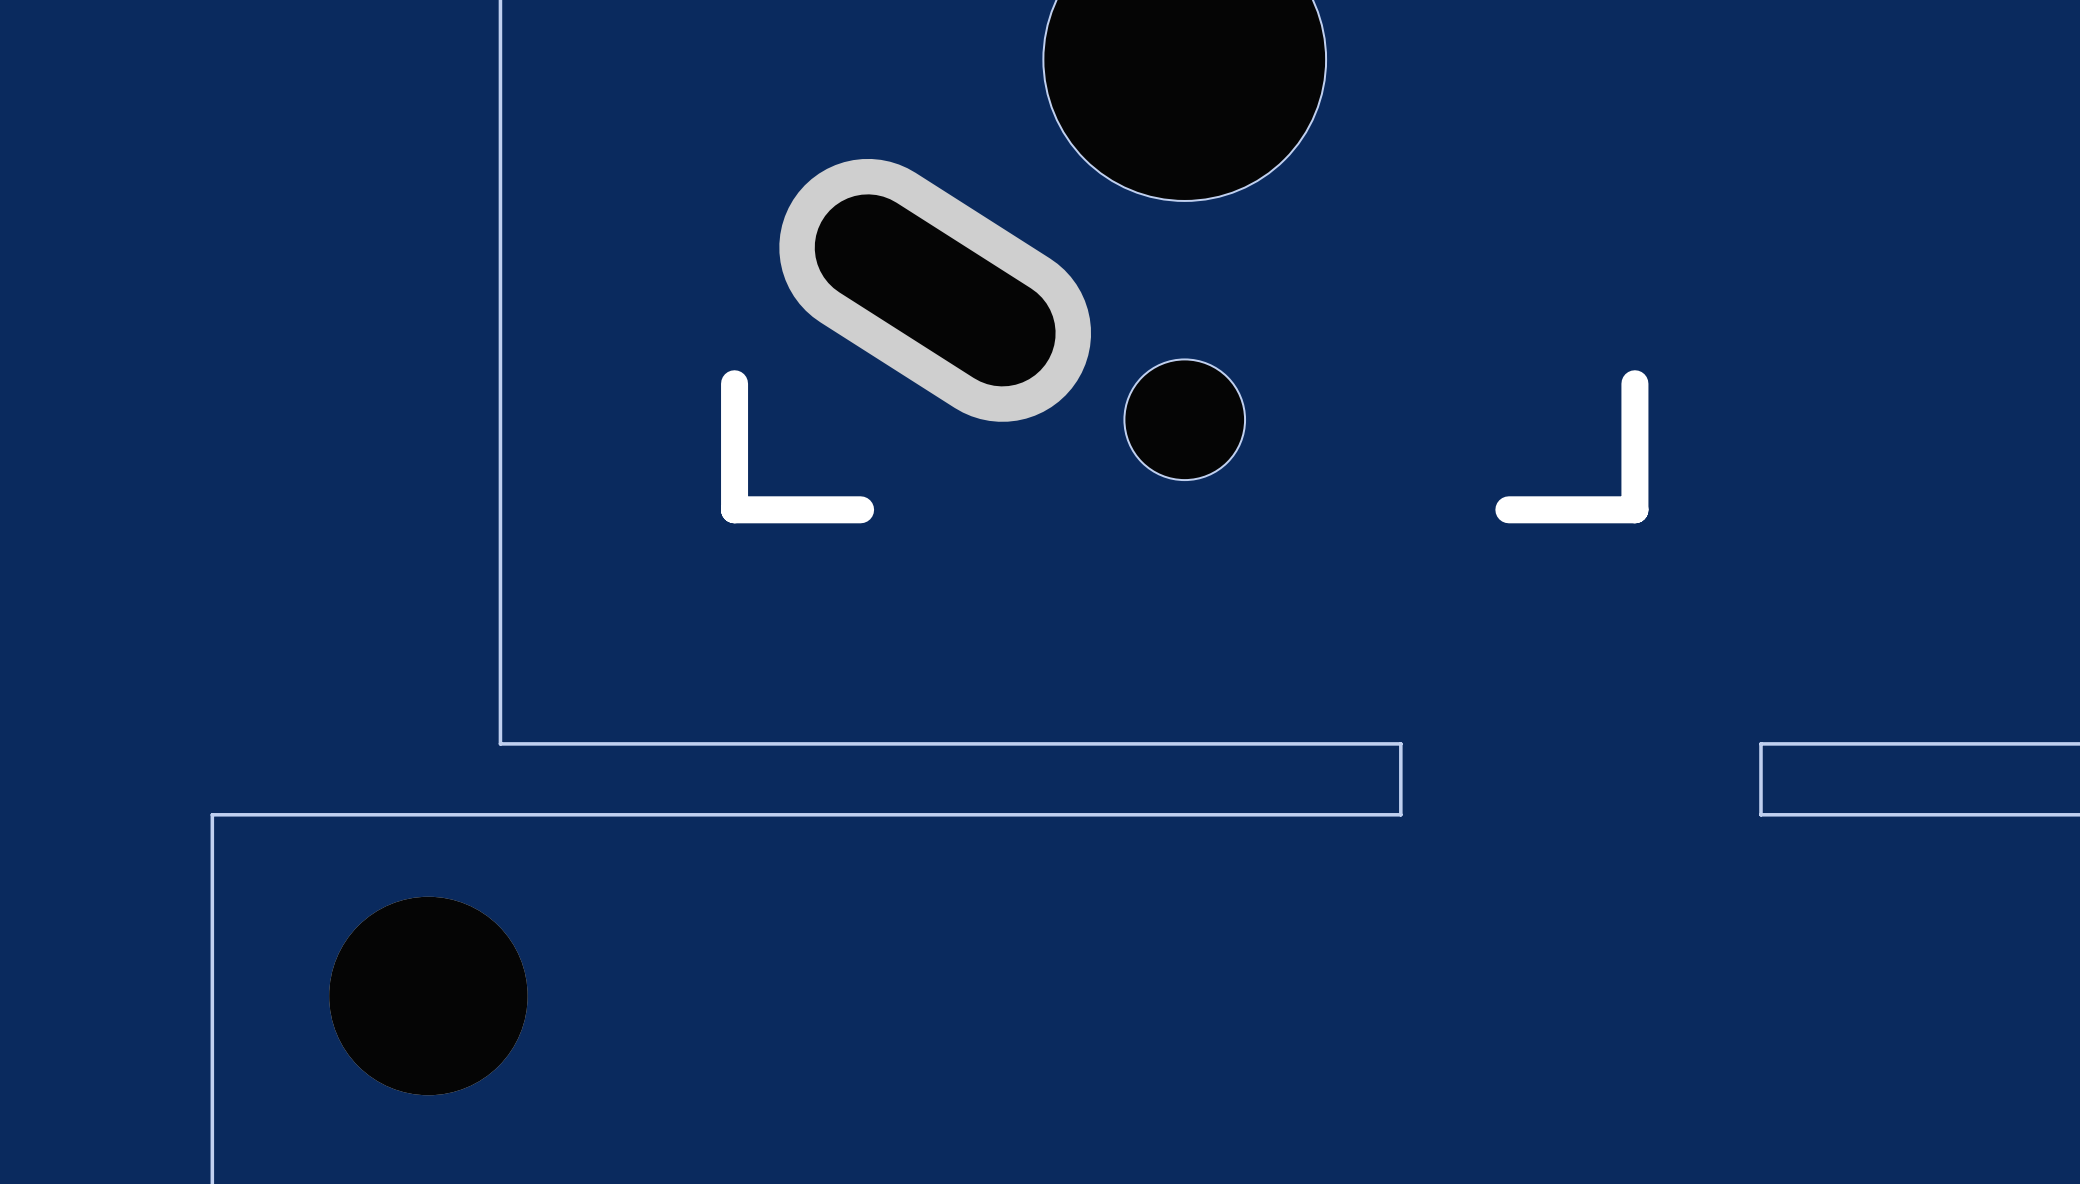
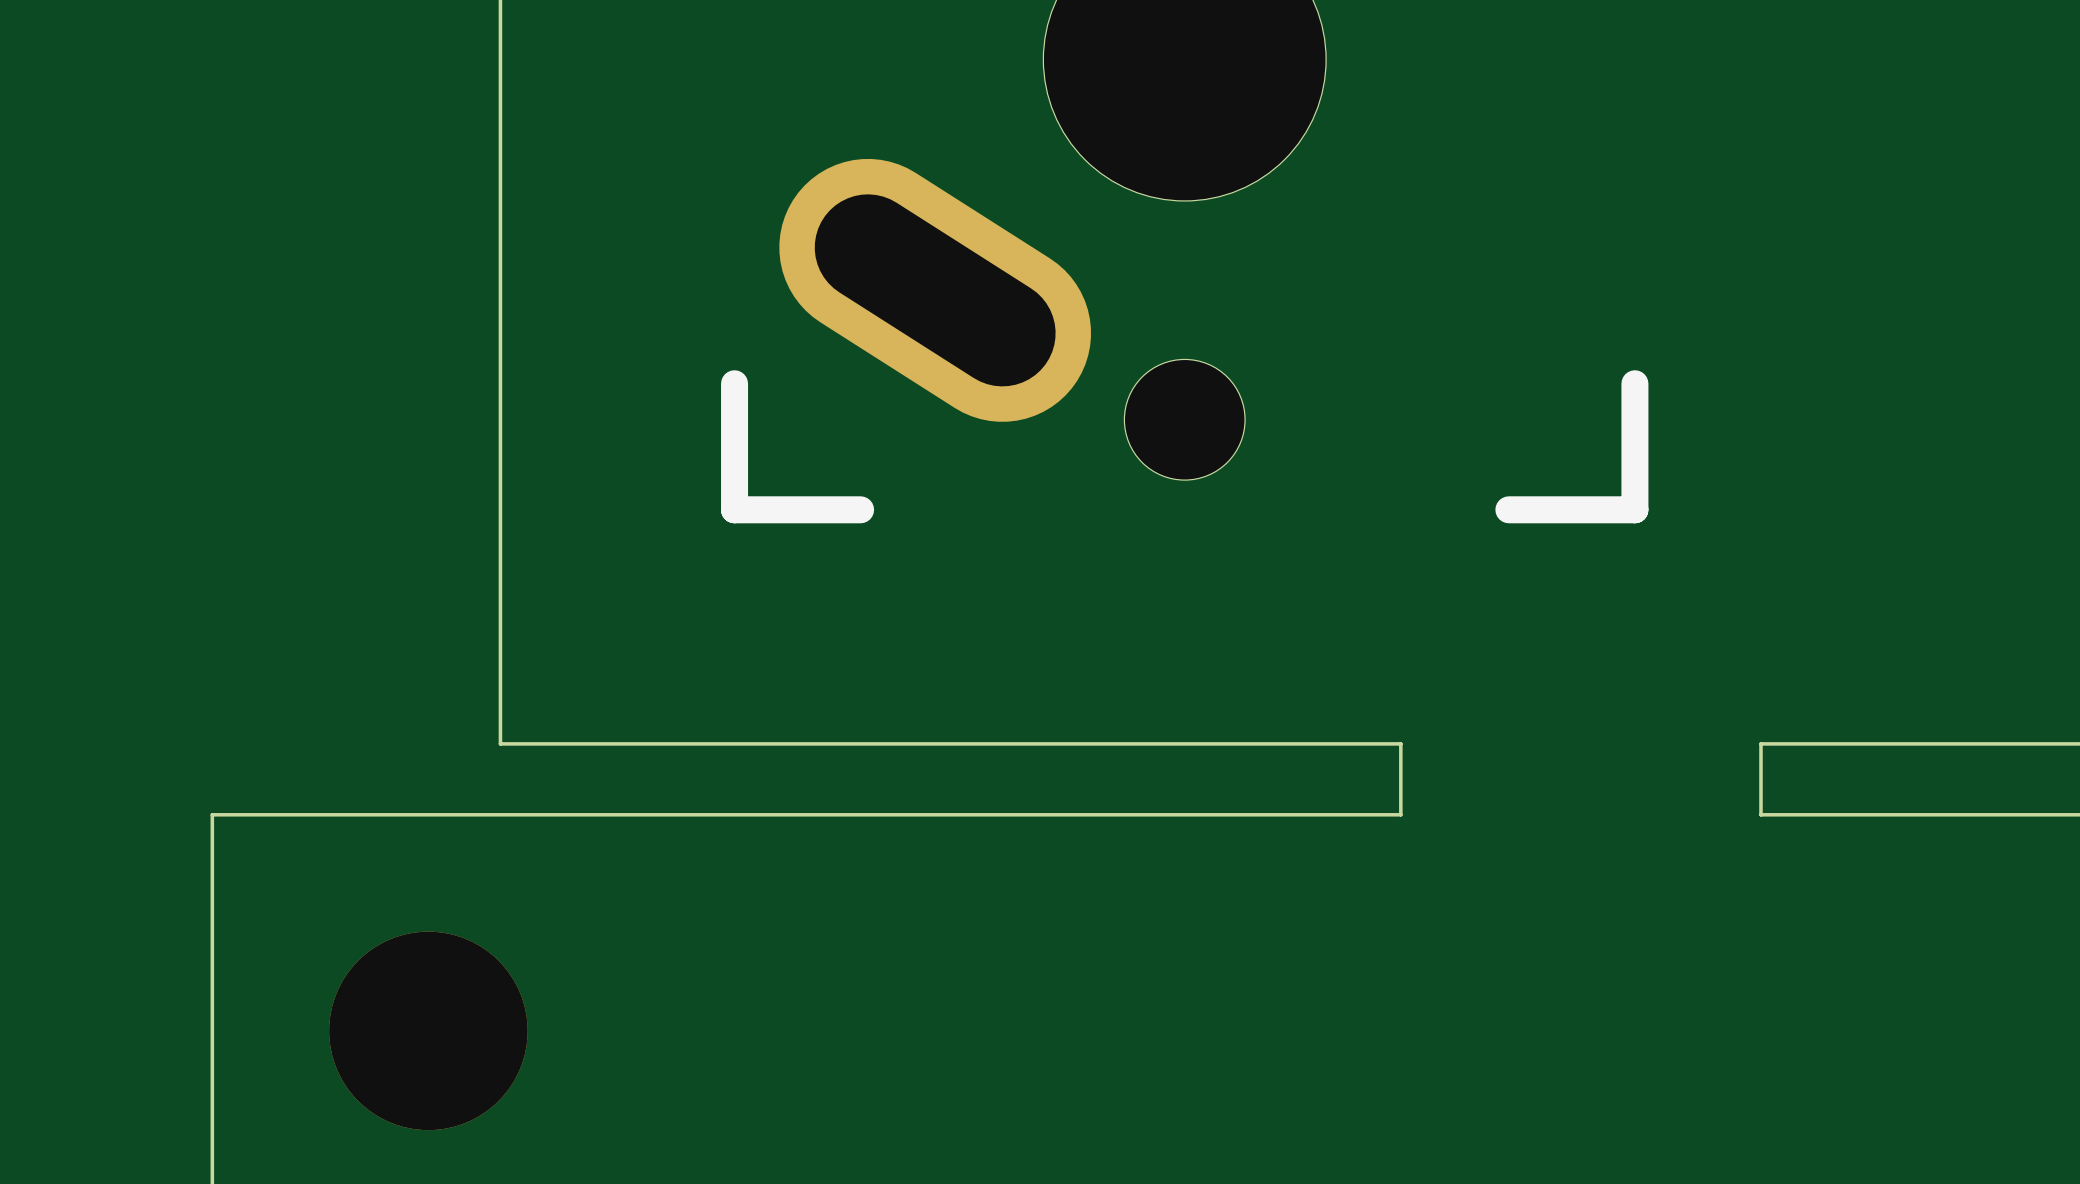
part position: (428, 996) -> (428, 1030)

